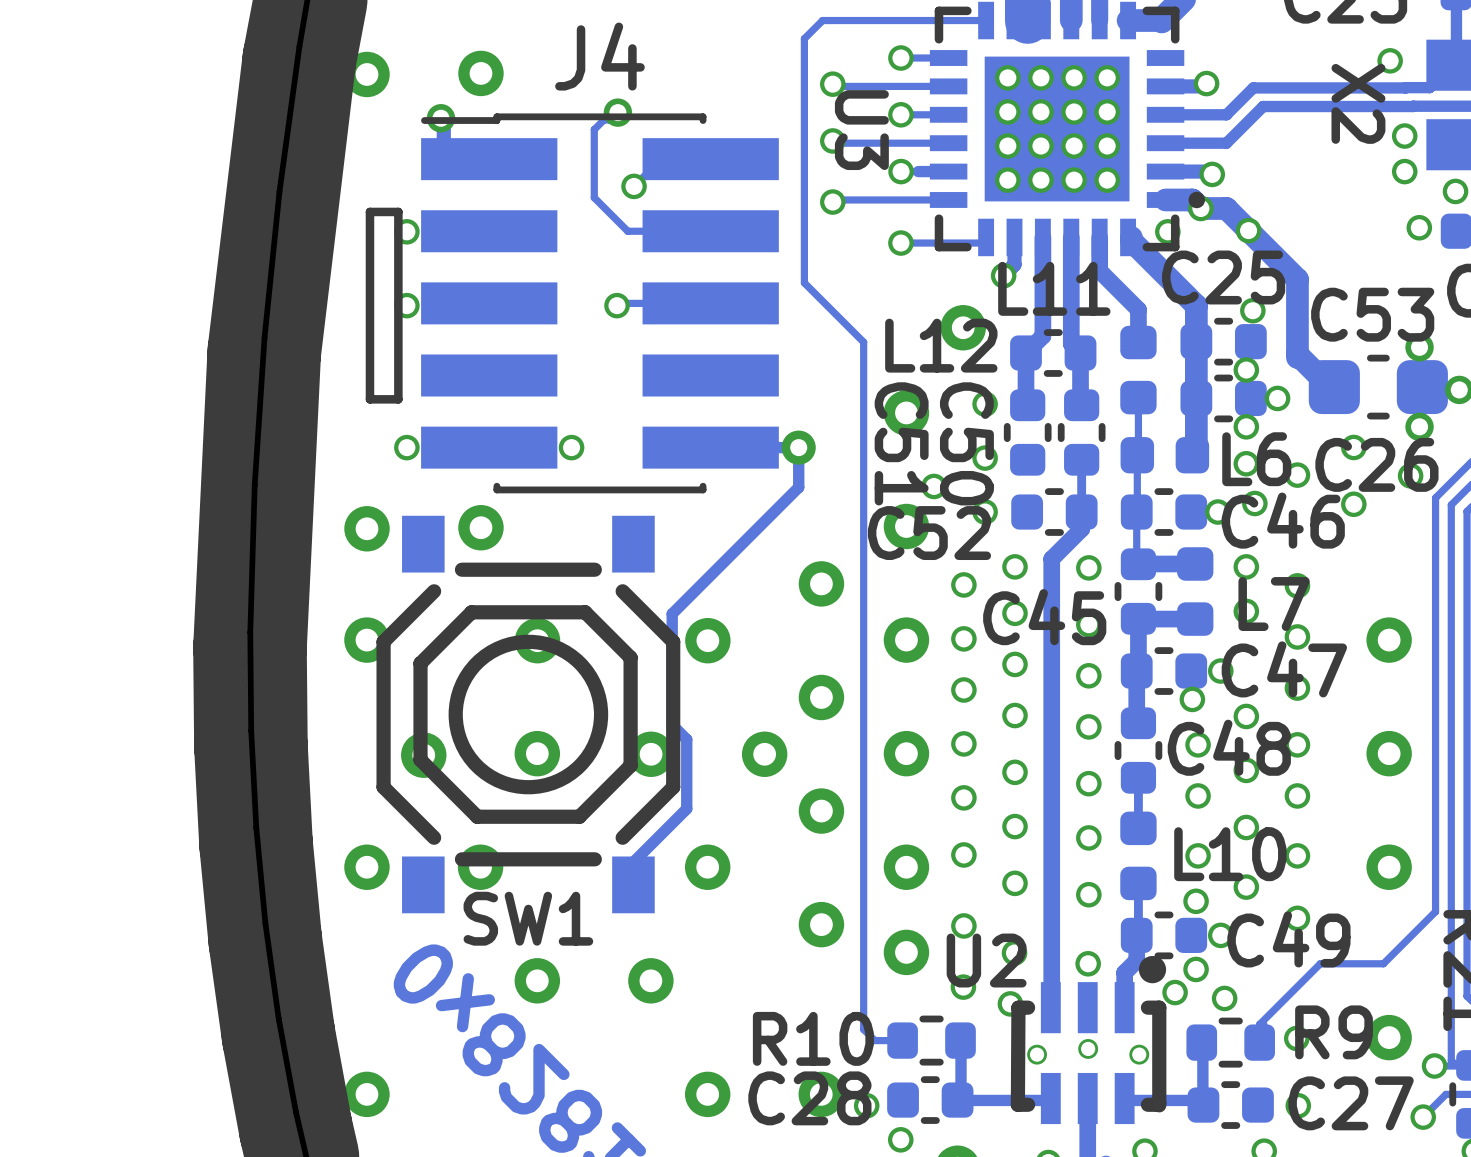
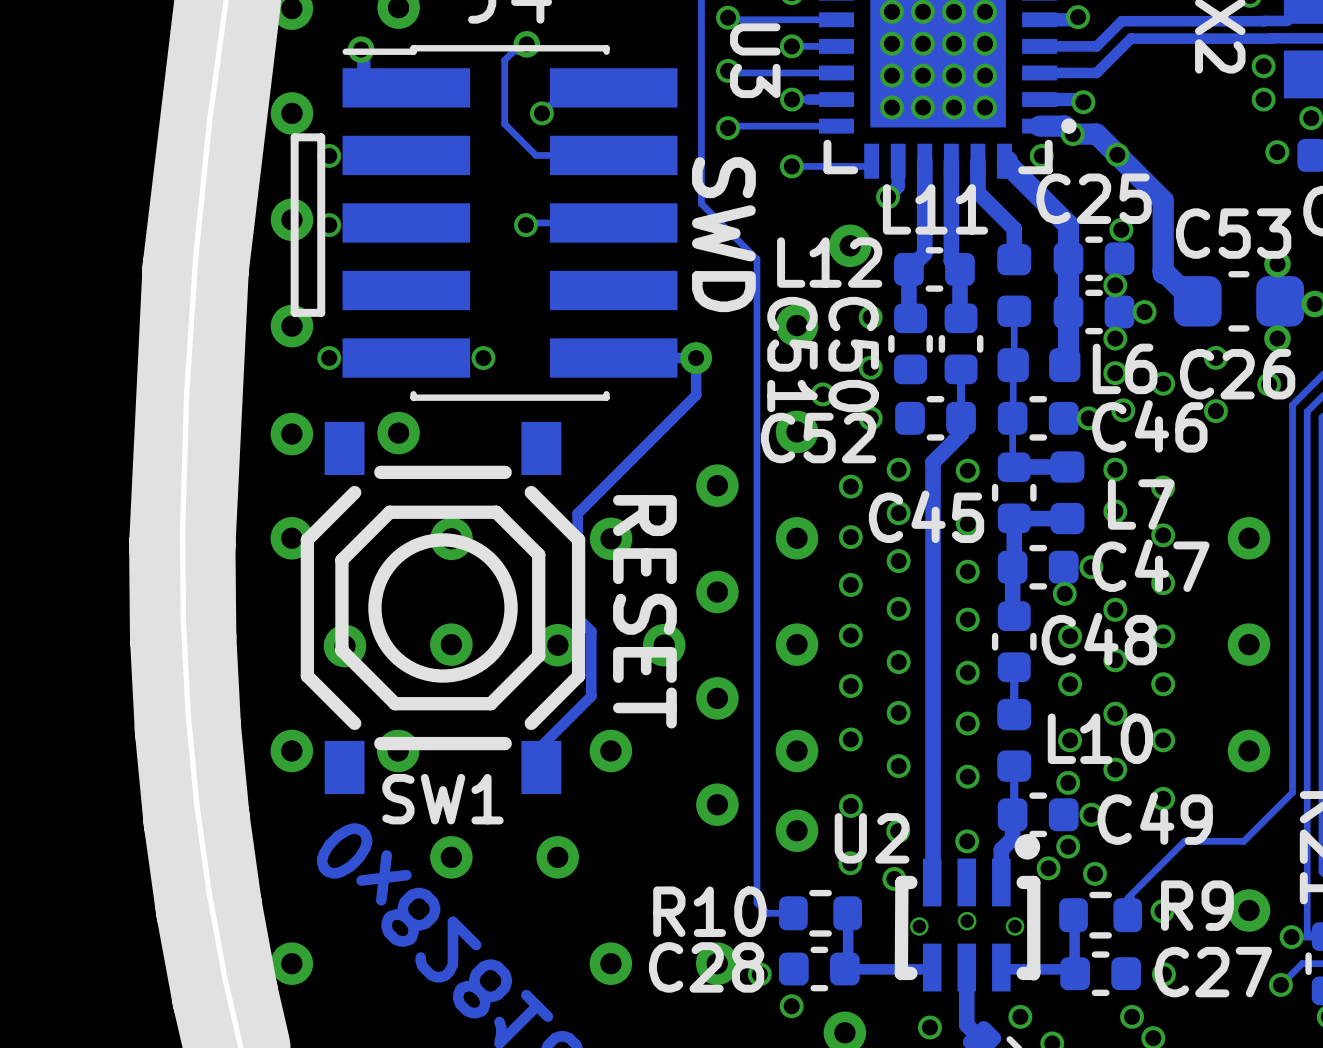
via: none -> (291, 113)
via: none -> (291, 219)
text: none -> SWD (723, 234)
via: none -> (291, 326)
SW1 value: none -> RESET (644, 611)

